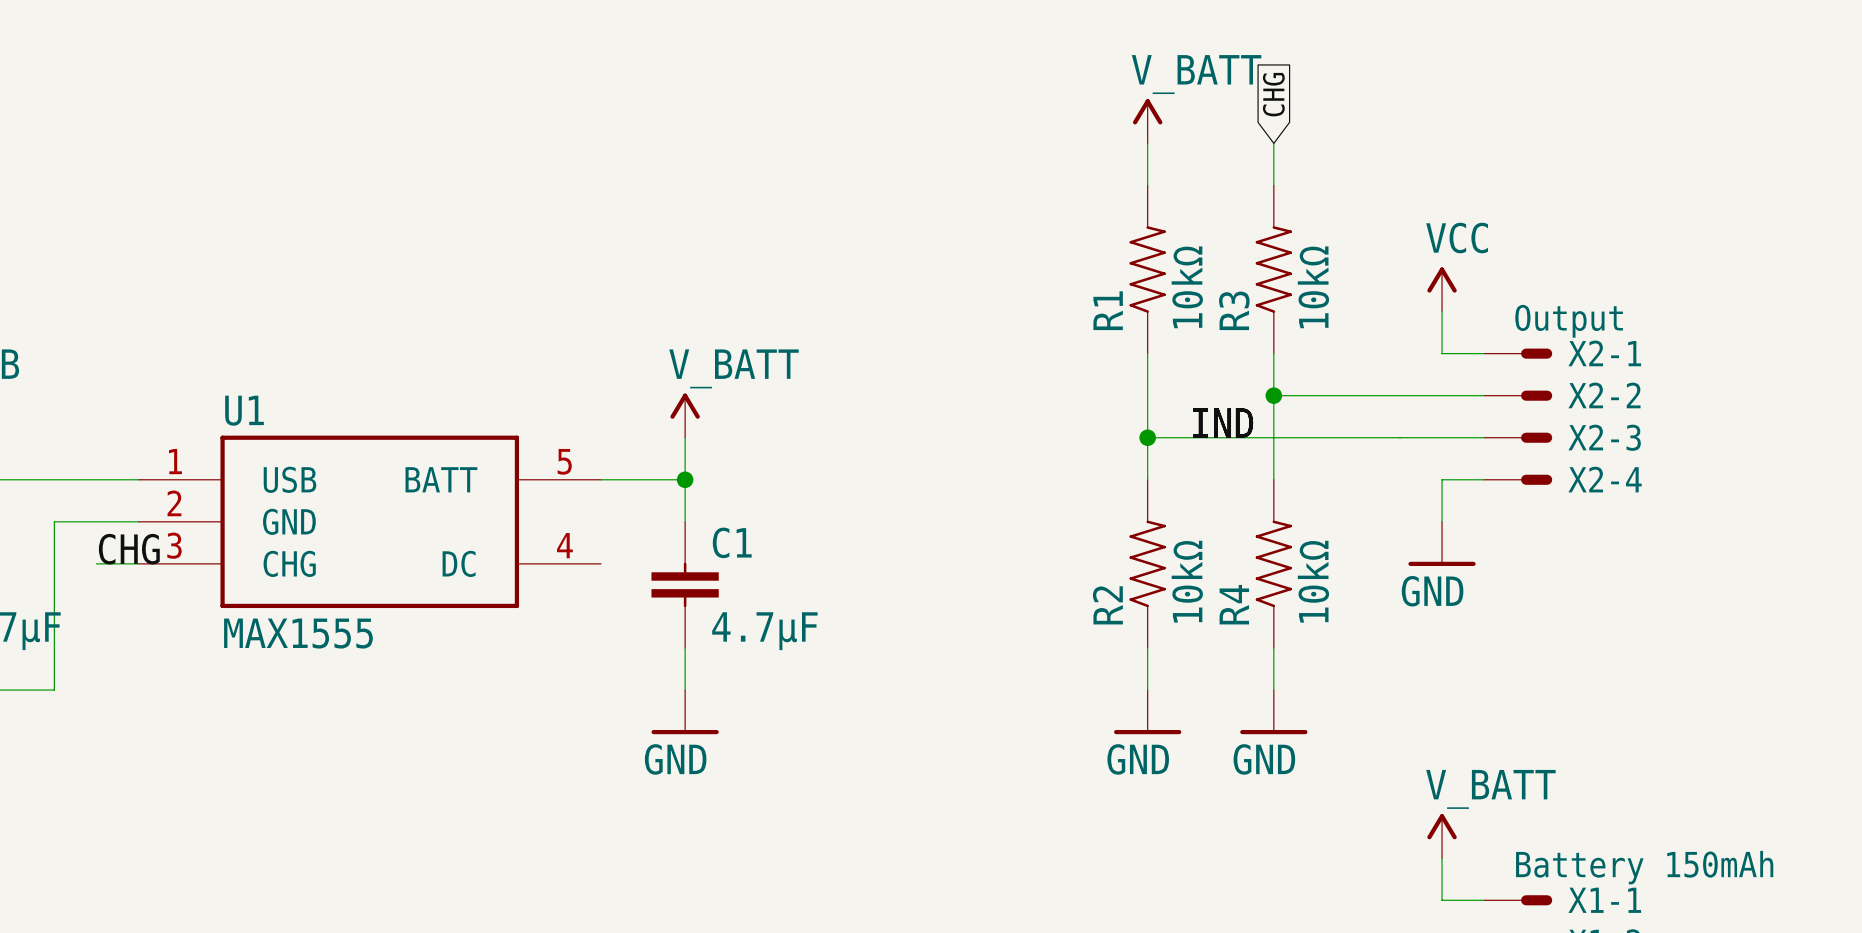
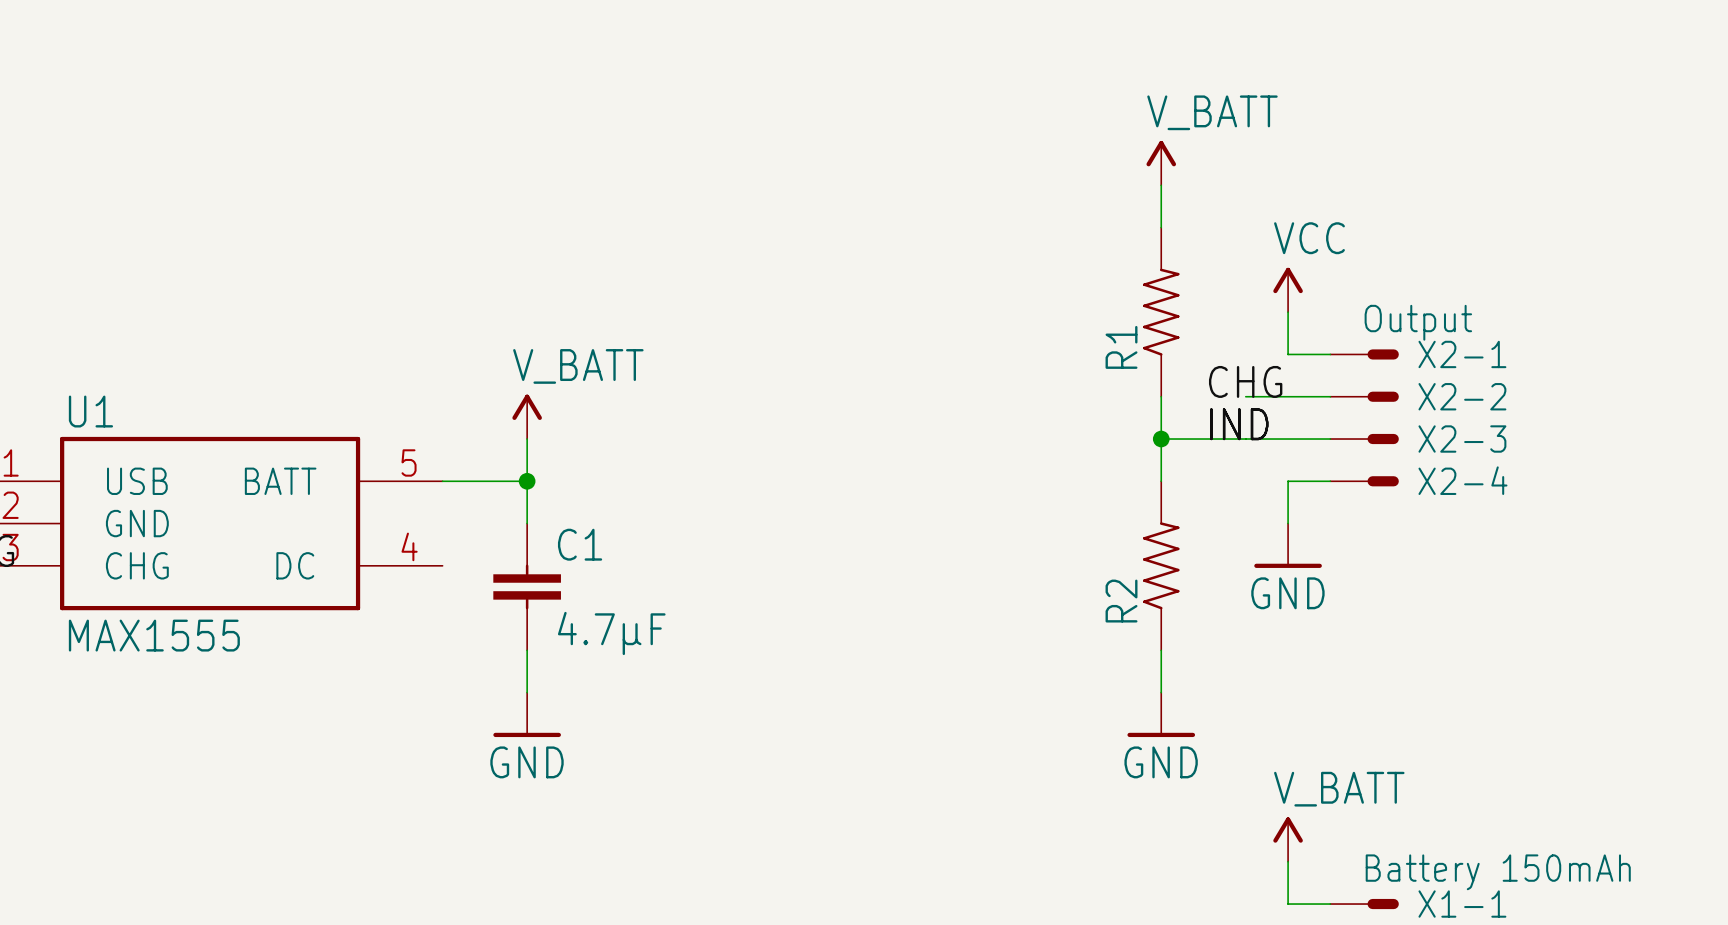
global label: CHG (1273, 94) -> none
power symbol position: V_BATT (1147, 121) -> V_BATT (1161, 163)
wire: (1147, 143) (1147, 185) -> none
wire: (1273, 143) (1273, 185) -> (1161, 185) (1161, 227)
R1 position: (1147, 269) -> (1161, 312)
R3: 10kΩ (1273, 269) -> none
R1 value: 10kΩ (1187, 287) -> none
wire: (1147, 353) (1147, 479) -> none
wire: (1273, 353) (1273, 479) -> none
label: none -> CHG (1245, 381)
wire: (1273, 395) (1399, 395) -> none
junction position: (1273, 395) -> (1161, 439)
wire: none -> (1161, 396) (1161, 481)
label position: IND (1223, 423) -> IND (1239, 424)
wire: (1147, 437) (1315, 437) -> none
junction: (1147, 437) -> none
R2 position: (1147, 563) -> (1161, 565)
R4: 10kΩ (1273, 563) -> none
R2 value: 10kΩ (1187, 581) -> none
wire: (1147, 647) (1147, 690) -> none
wire: (1273, 647) (1273, 690) -> (1161, 650) (1161, 692)
power symbol: GND (1147, 712) -> none
power symbol position: GND (1273, 712) -> GND (1161, 714)

